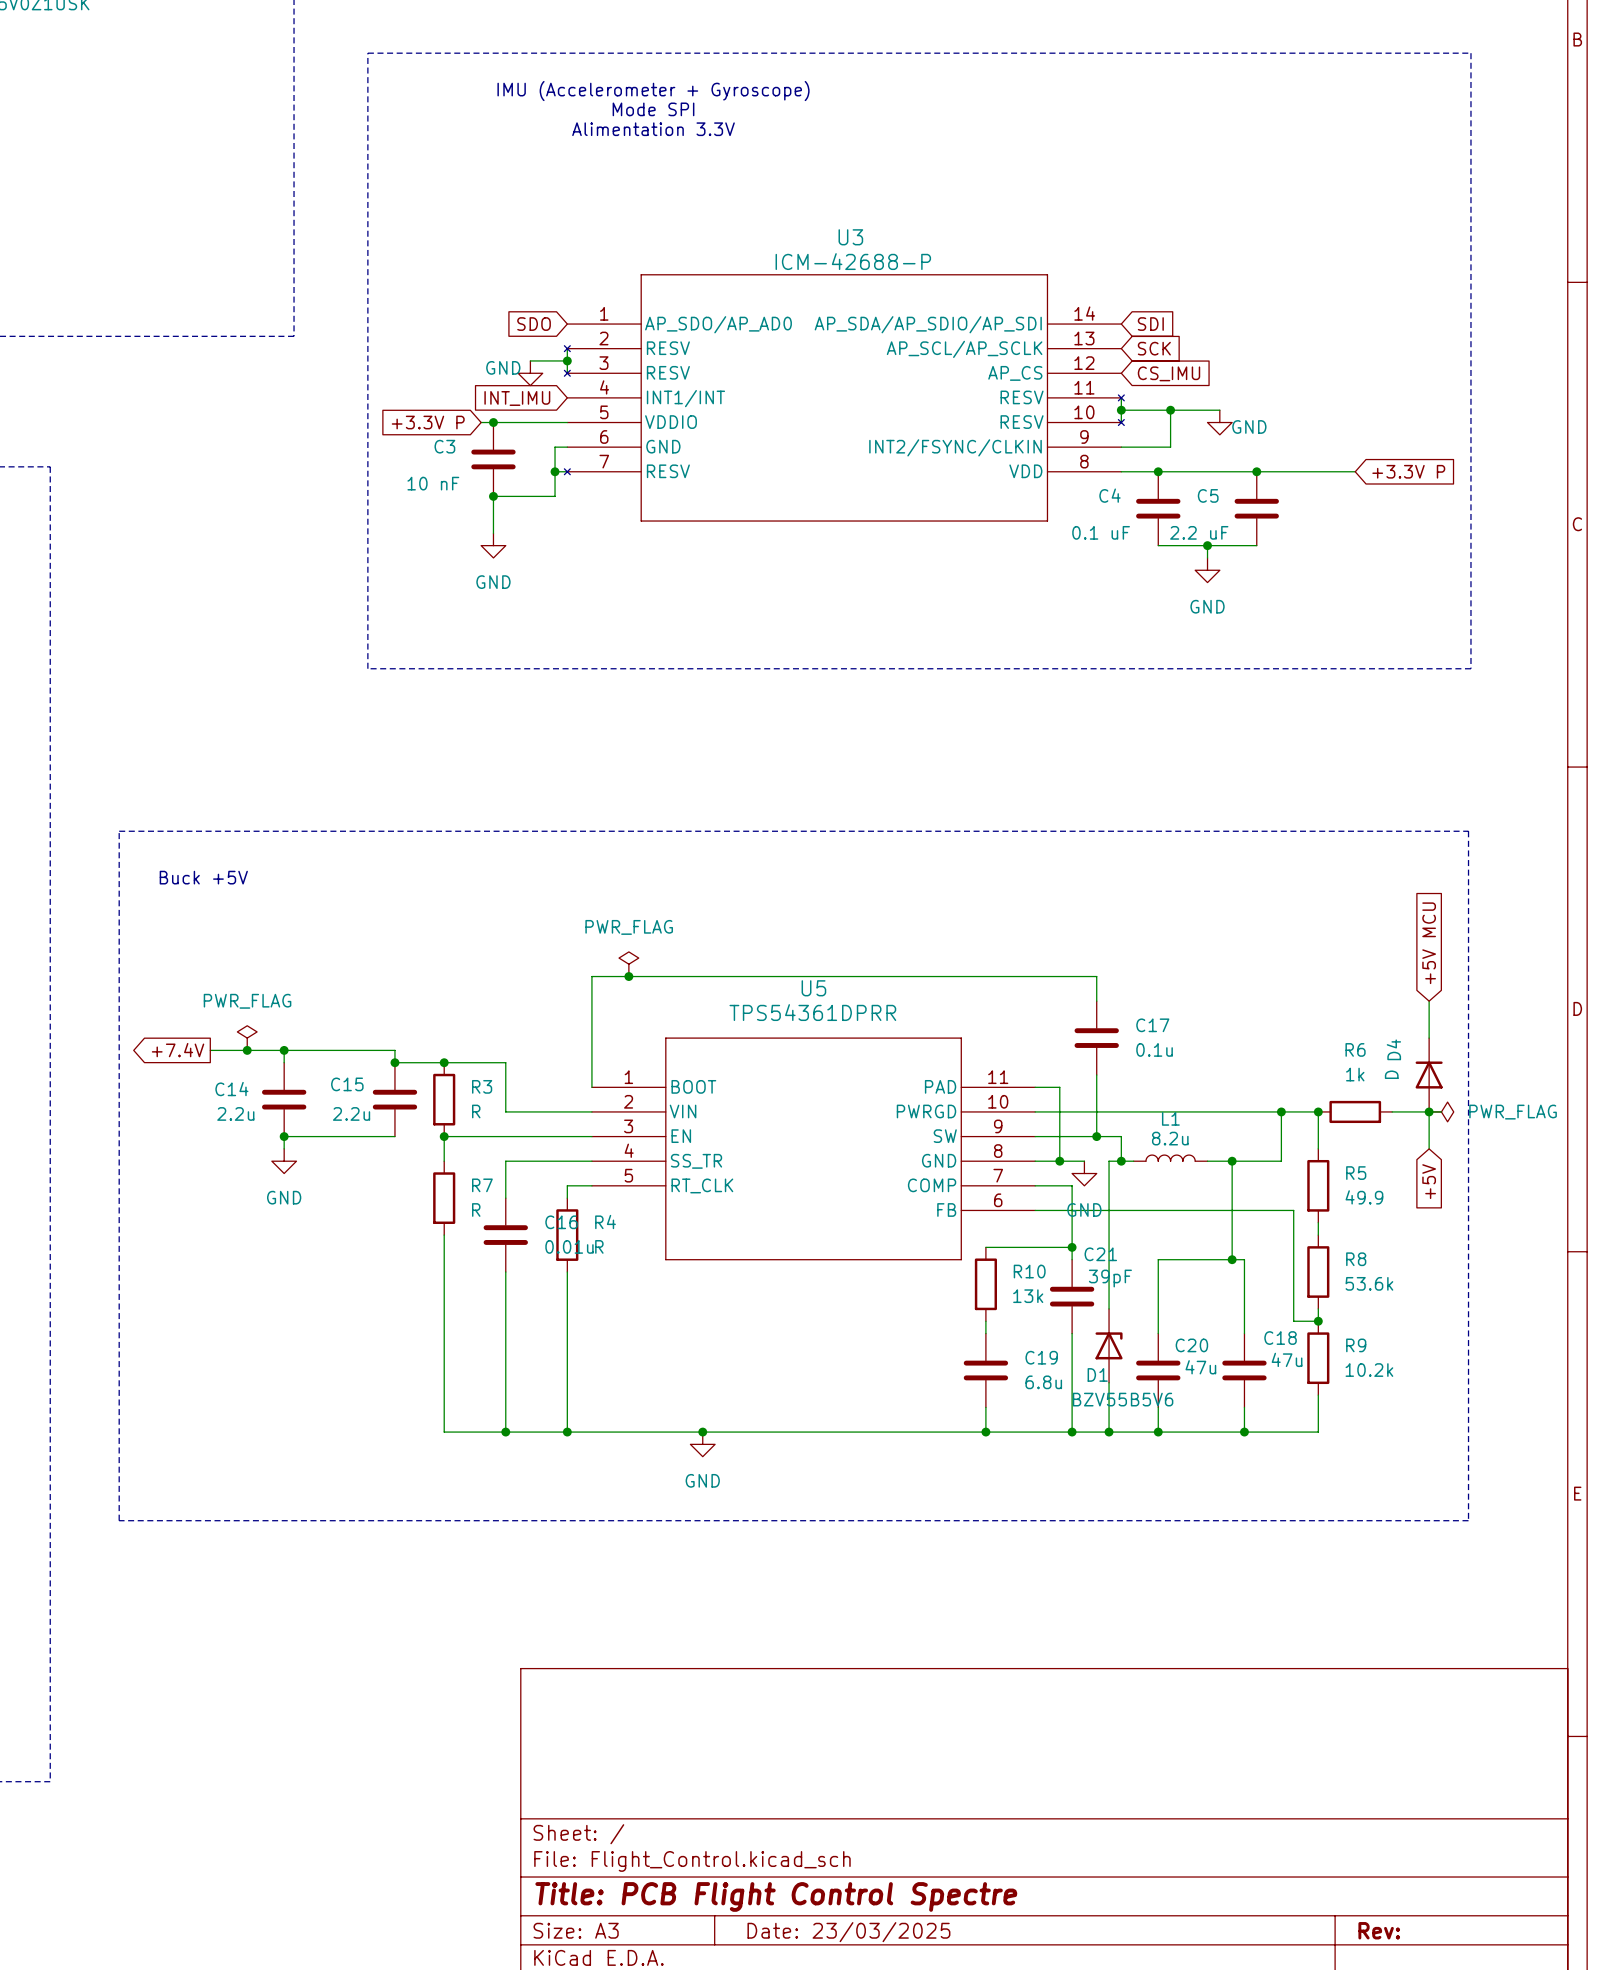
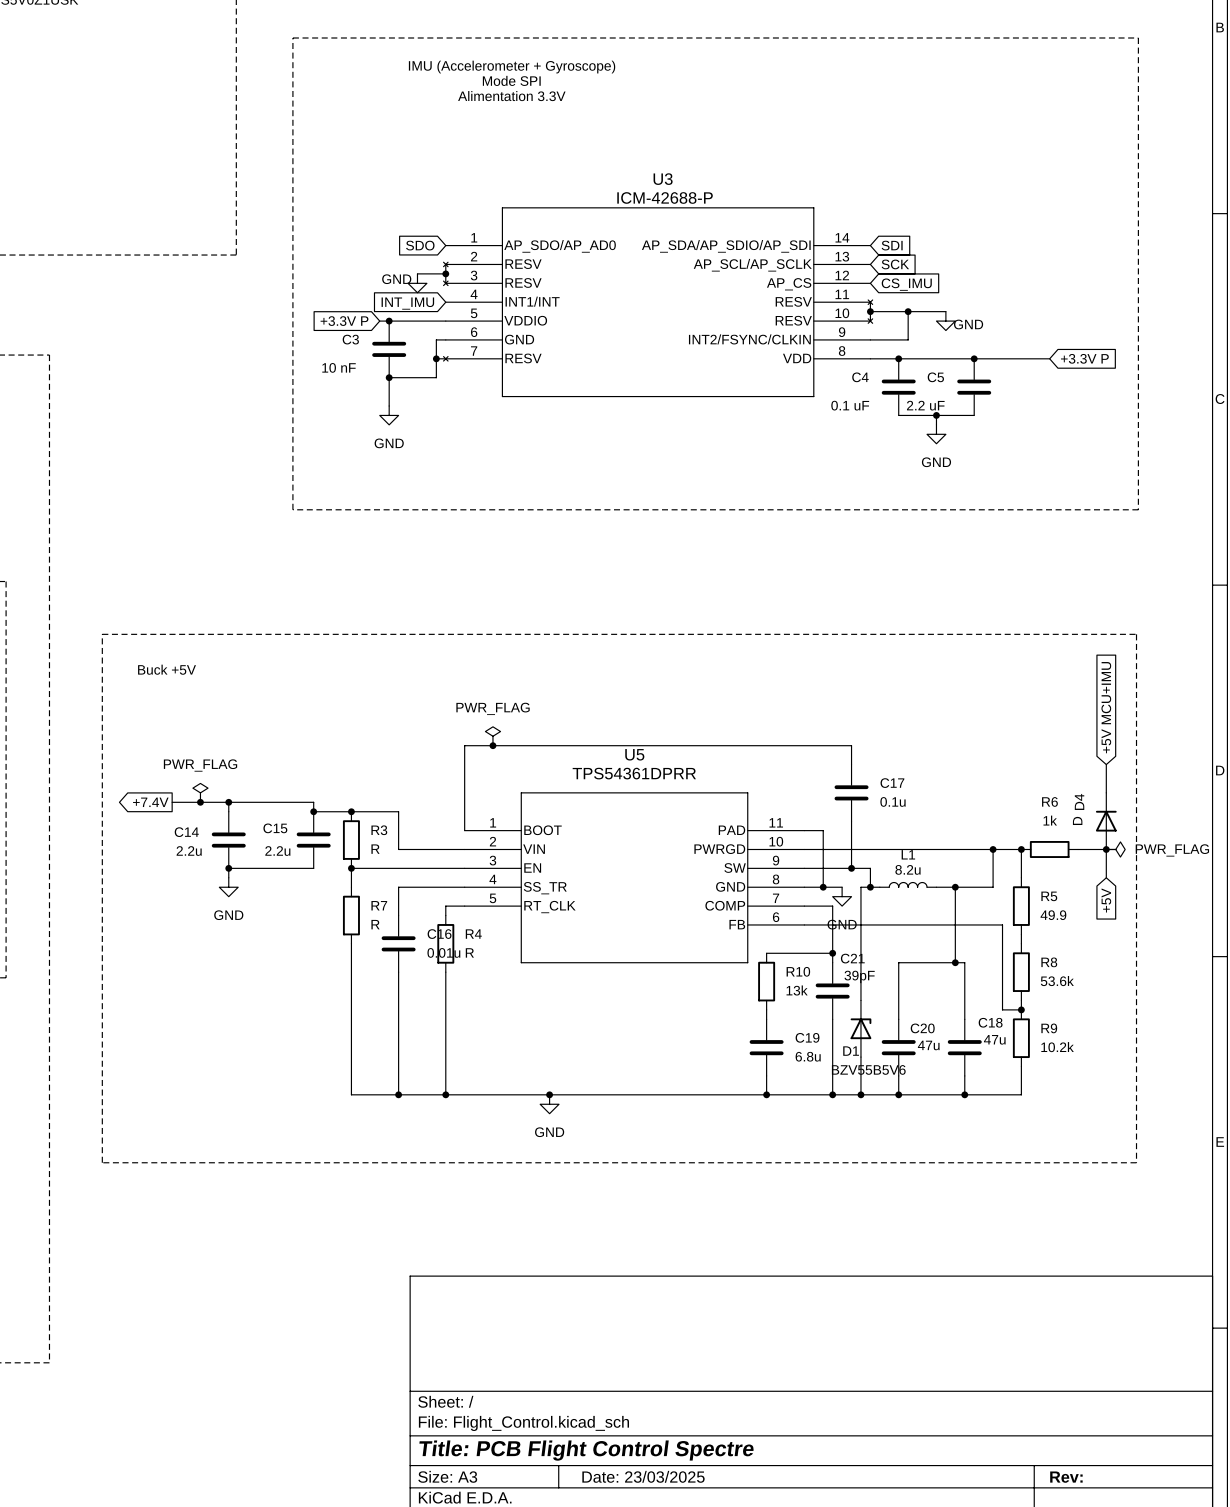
global label: +5V MCU (1429, 943) -> +5V MCU+IMU (1106, 707)

